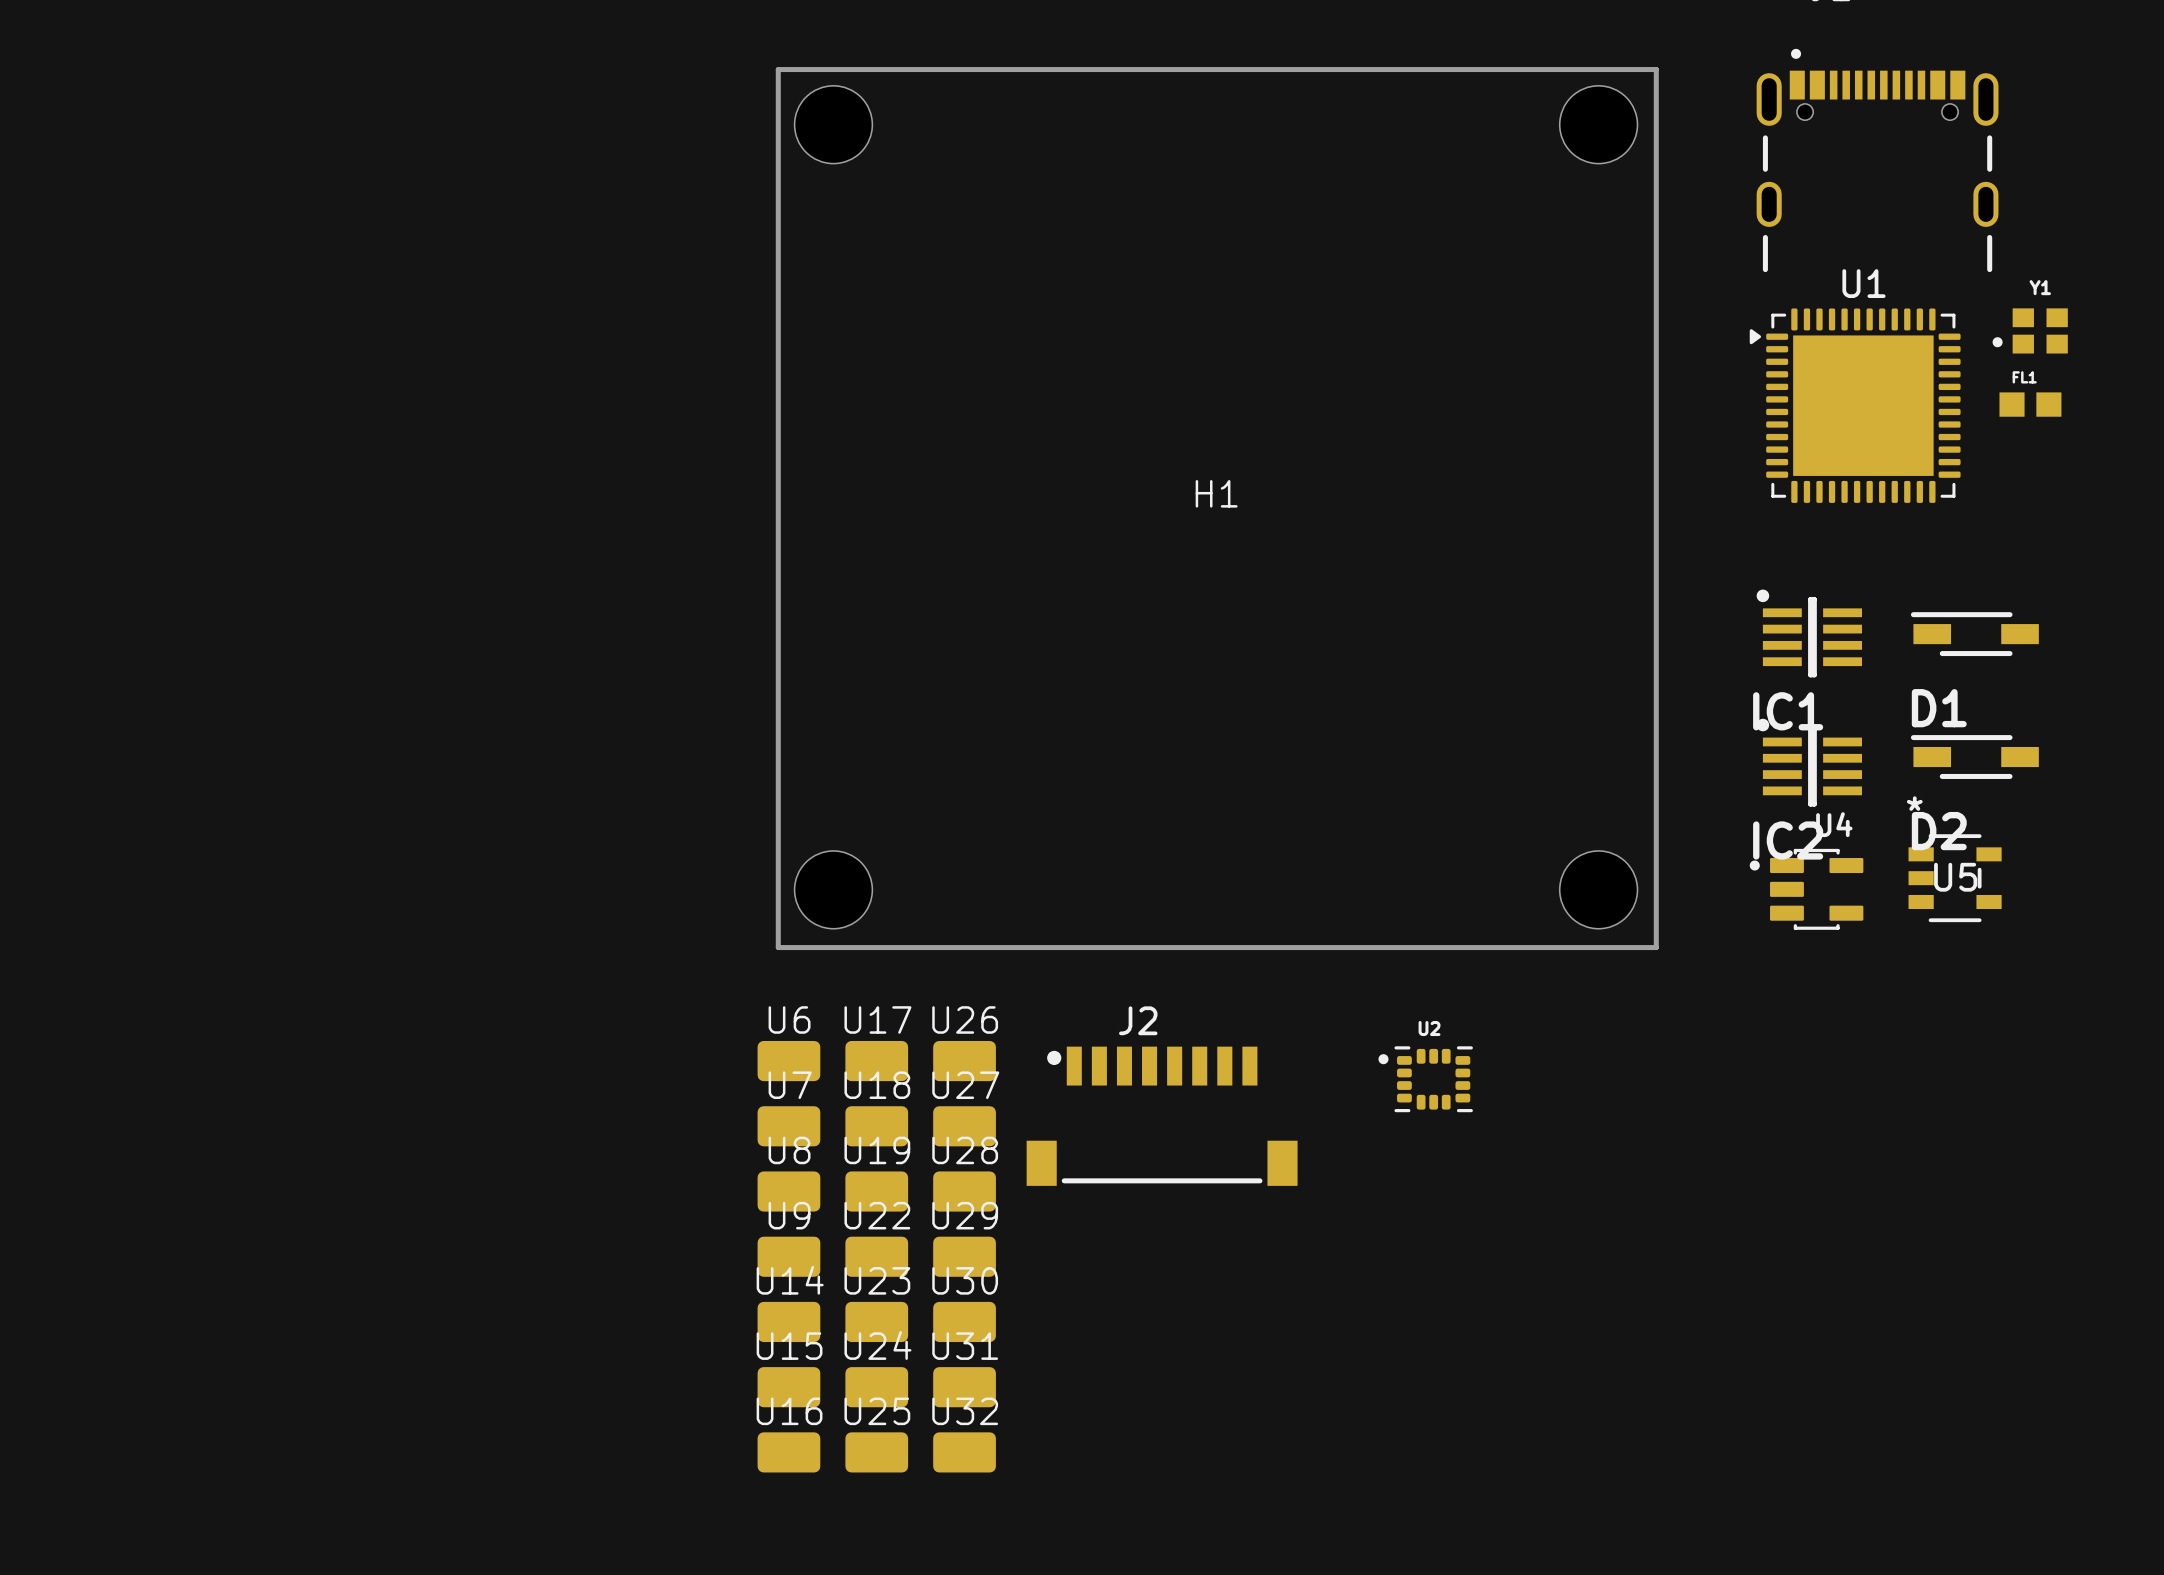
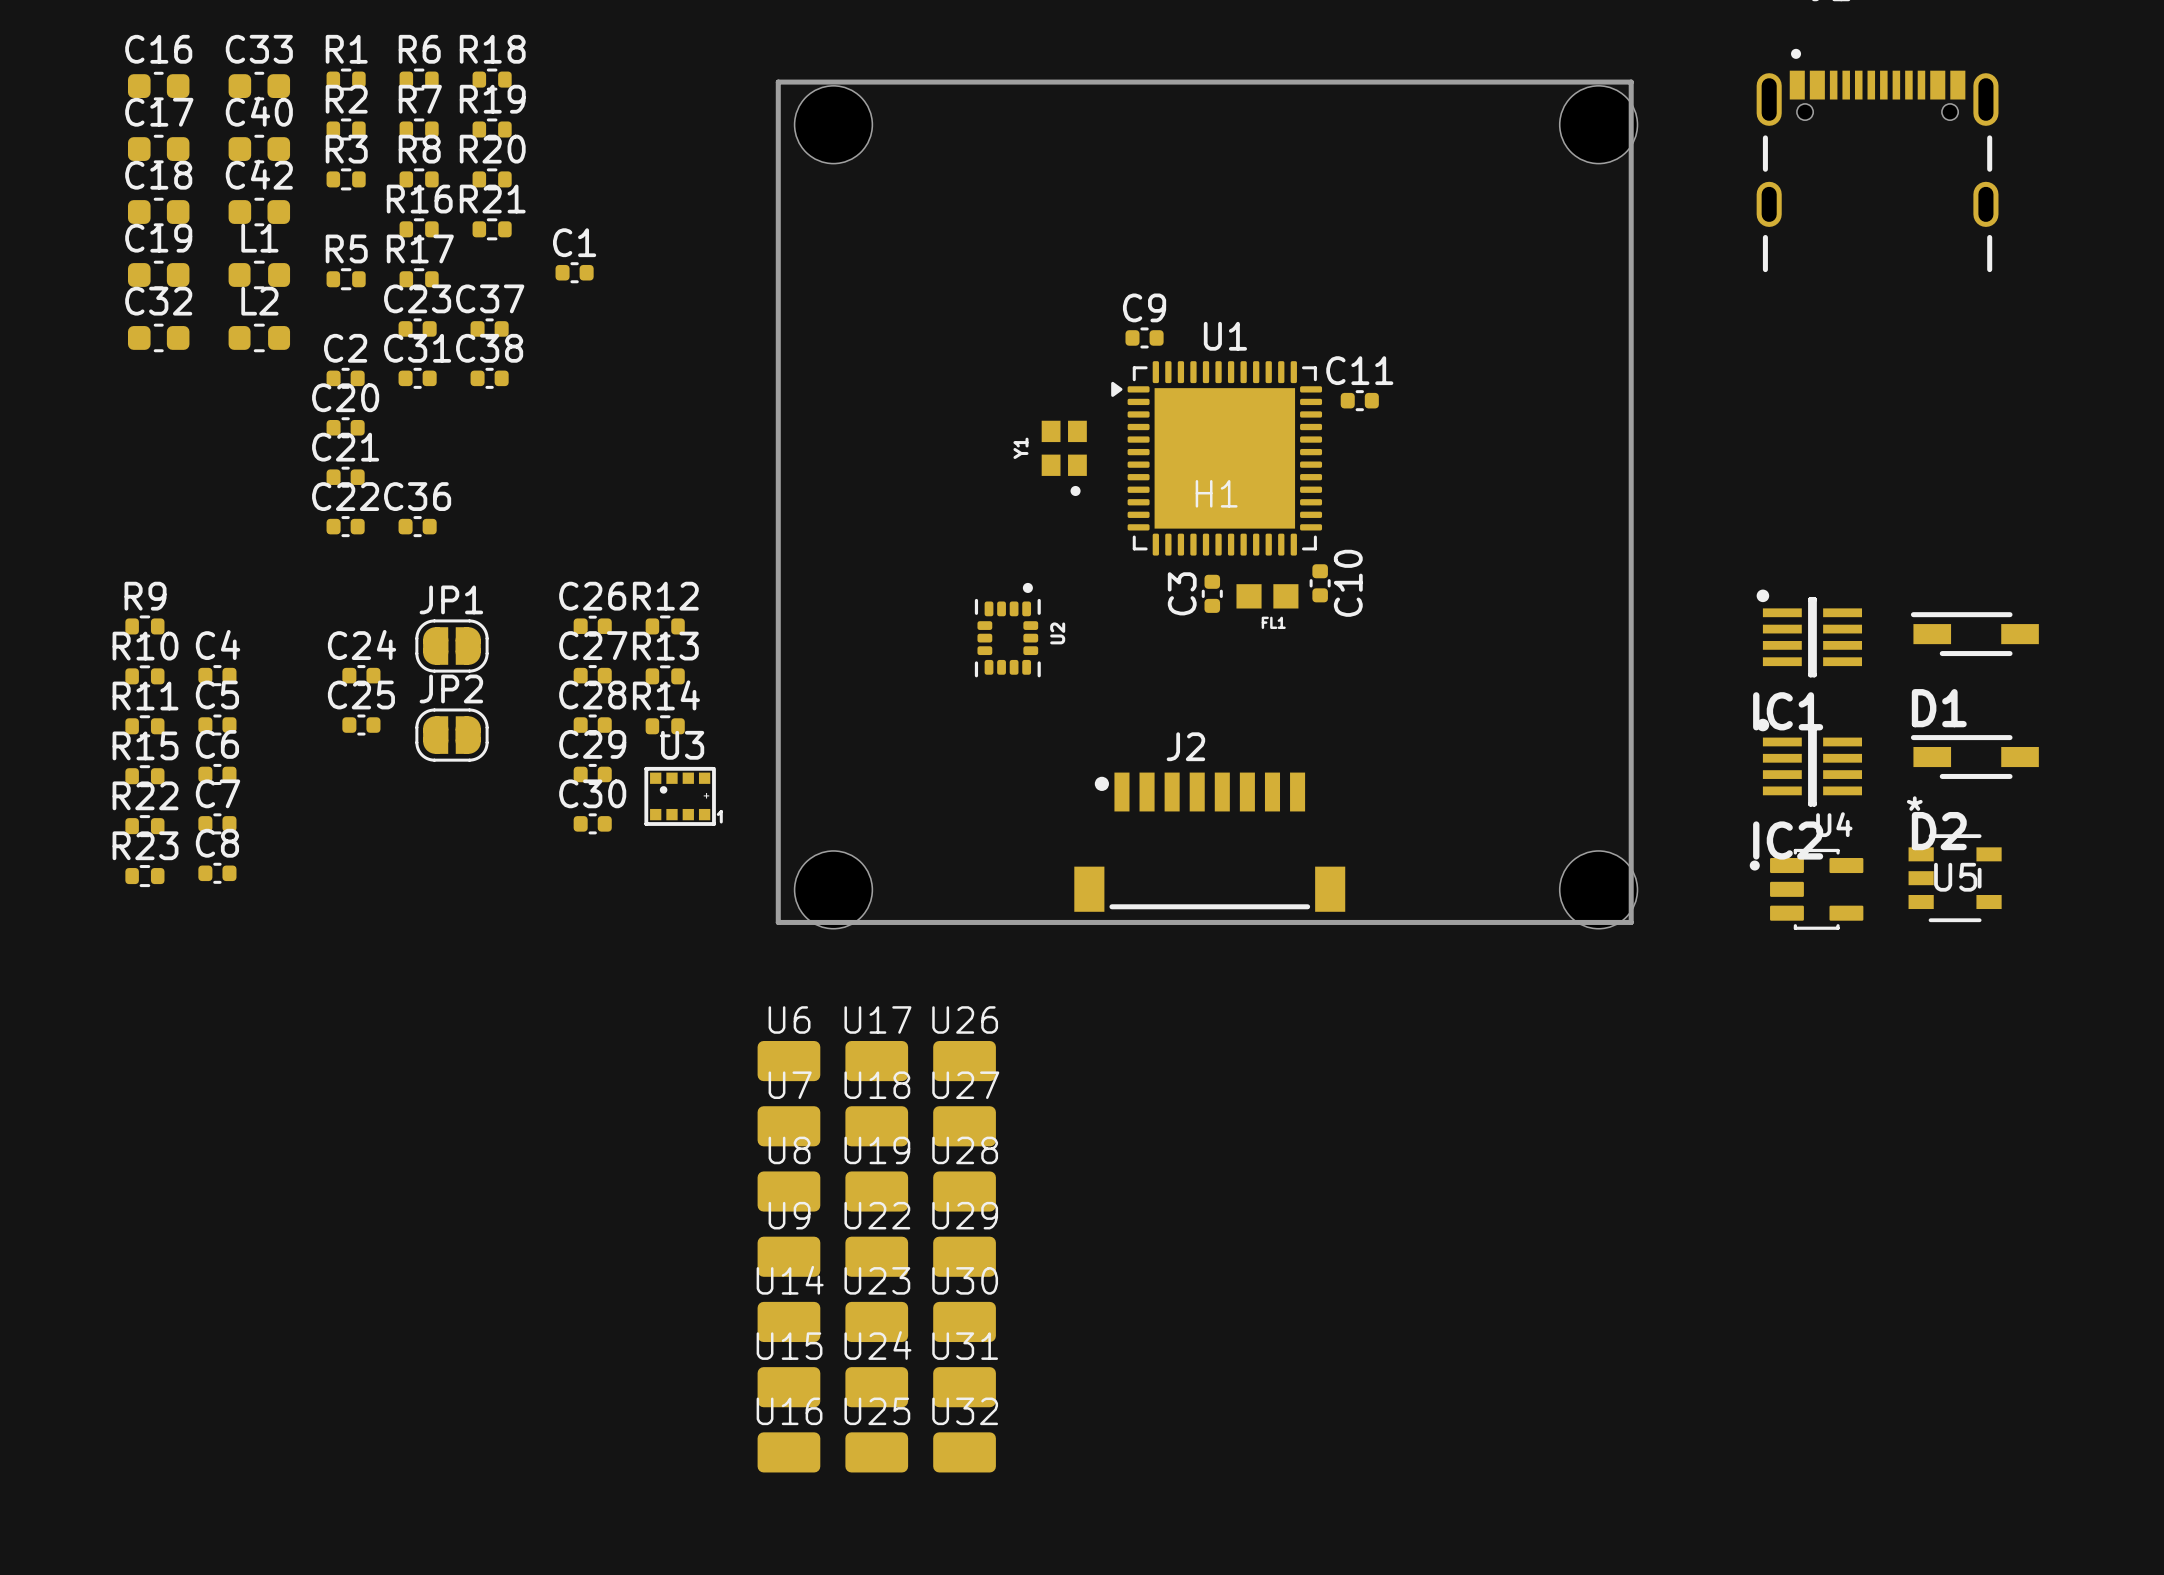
R1: none -> (346, 79)
R6: none -> (419, 79)
R18: none -> (492, 79)
board edge: (778, 82) (778, 69) (1656, 69) (1656, 947) (778, 947) (778, 922) -> (778, 82) (1631, 82) (1631, 922) (778, 922)
C16: none -> (158, 86)
C33: none -> (259, 86)
R2: none -> (346, 129)
R7: none -> (419, 129)
R19: none -> (492, 129)
C17: none -> (158, 149)
C40: none -> (259, 149)
R3: none -> (346, 179)
R8: none -> (419, 179)
R20: none -> (492, 179)
C18: none -> (158, 212)
C42: none -> (259, 212)
R16: none -> (419, 229)
R21: none -> (492, 229)
C1: none -> (574, 272)
C19: none -> (158, 274)
L1: none -> (259, 274)
R5: none -> (346, 279)
R17: none -> (419, 279)
C23: none -> (417, 328)
C37: none -> (489, 328)
Y1 rotation: 0° (2030, 330) -> 90° counterclockwise (1064, 458)
Y1 position: (2030, 330) -> (1064, 458)
C32: none -> (158, 337)
L2: none -> (259, 337)
C9: none -> (1144, 337)
FL1 name position: FL1 (2024, 377) -> FL1 (1273, 622)
C2: none -> (345, 378)
C31: none -> (417, 378)
C38: none -> (489, 378)
C11: none -> (1359, 400)
FL1 position: (2030, 404) -> (1267, 596)
U1 position: (1855, 405) -> (1216, 458)
C20: none -> (345, 427)
C21: none -> (345, 477)
C22: none -> (345, 526)
C36: none -> (417, 526)
C10: none -> (1320, 583)
C3: none -> (1212, 593)
R9: none -> (144, 626)
C26: none -> (592, 626)
R12: none -> (665, 626)
JP1: none -> (451, 646)
C4: none -> (217, 675)
C24: none -> (361, 675)
C27: none -> (592, 675)
R10: none -> (144, 676)
R13: none -> (665, 676)
C5: none -> (217, 725)
C25: none -> (361, 725)
C28: none -> (592, 725)
R11: none -> (144, 726)
R14: none -> (665, 726)
JP2: none -> (451, 735)
C6: none -> (217, 774)
C29: none -> (592, 774)
R15: none -> (144, 776)
U3: none -> (683, 796)
C7: none -> (217, 823)
C30: none -> (592, 823)
R22: none -> (144, 826)
C8: none -> (217, 873)
R23: none -> (144, 876)
U2 rotation: 0° (1425, 1079) -> 90° clockwise (1007, 630)
U2 position: (1425, 1079) -> (1007, 630)
J2 position: (1162, 1116) -> (1209, 842)

